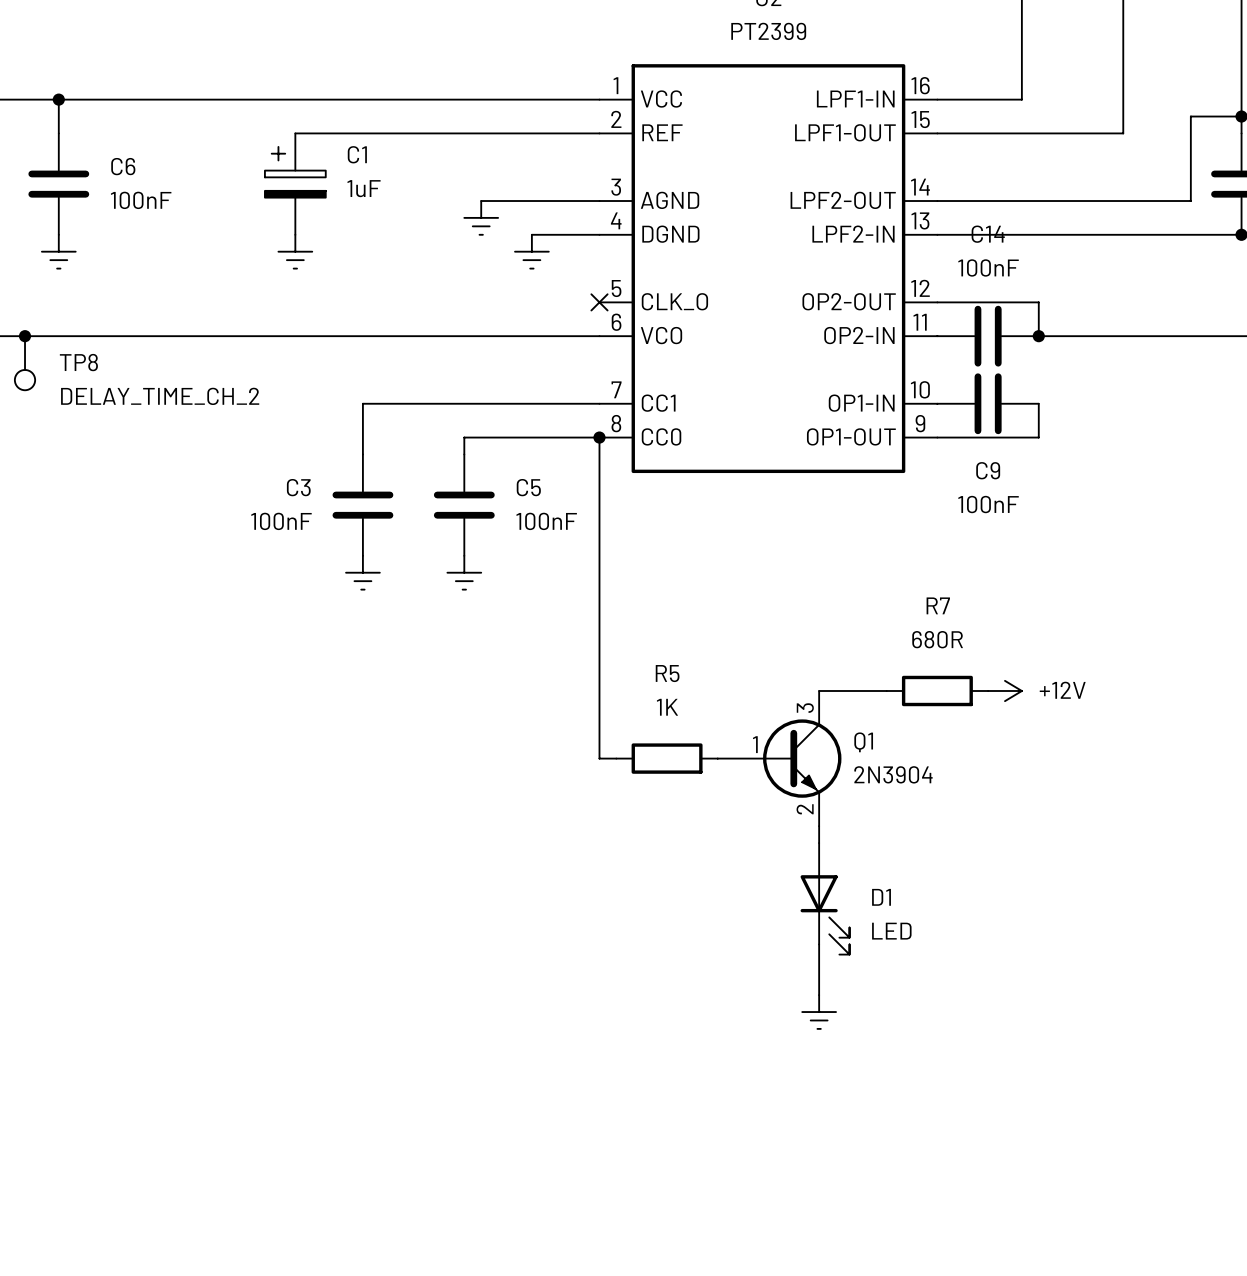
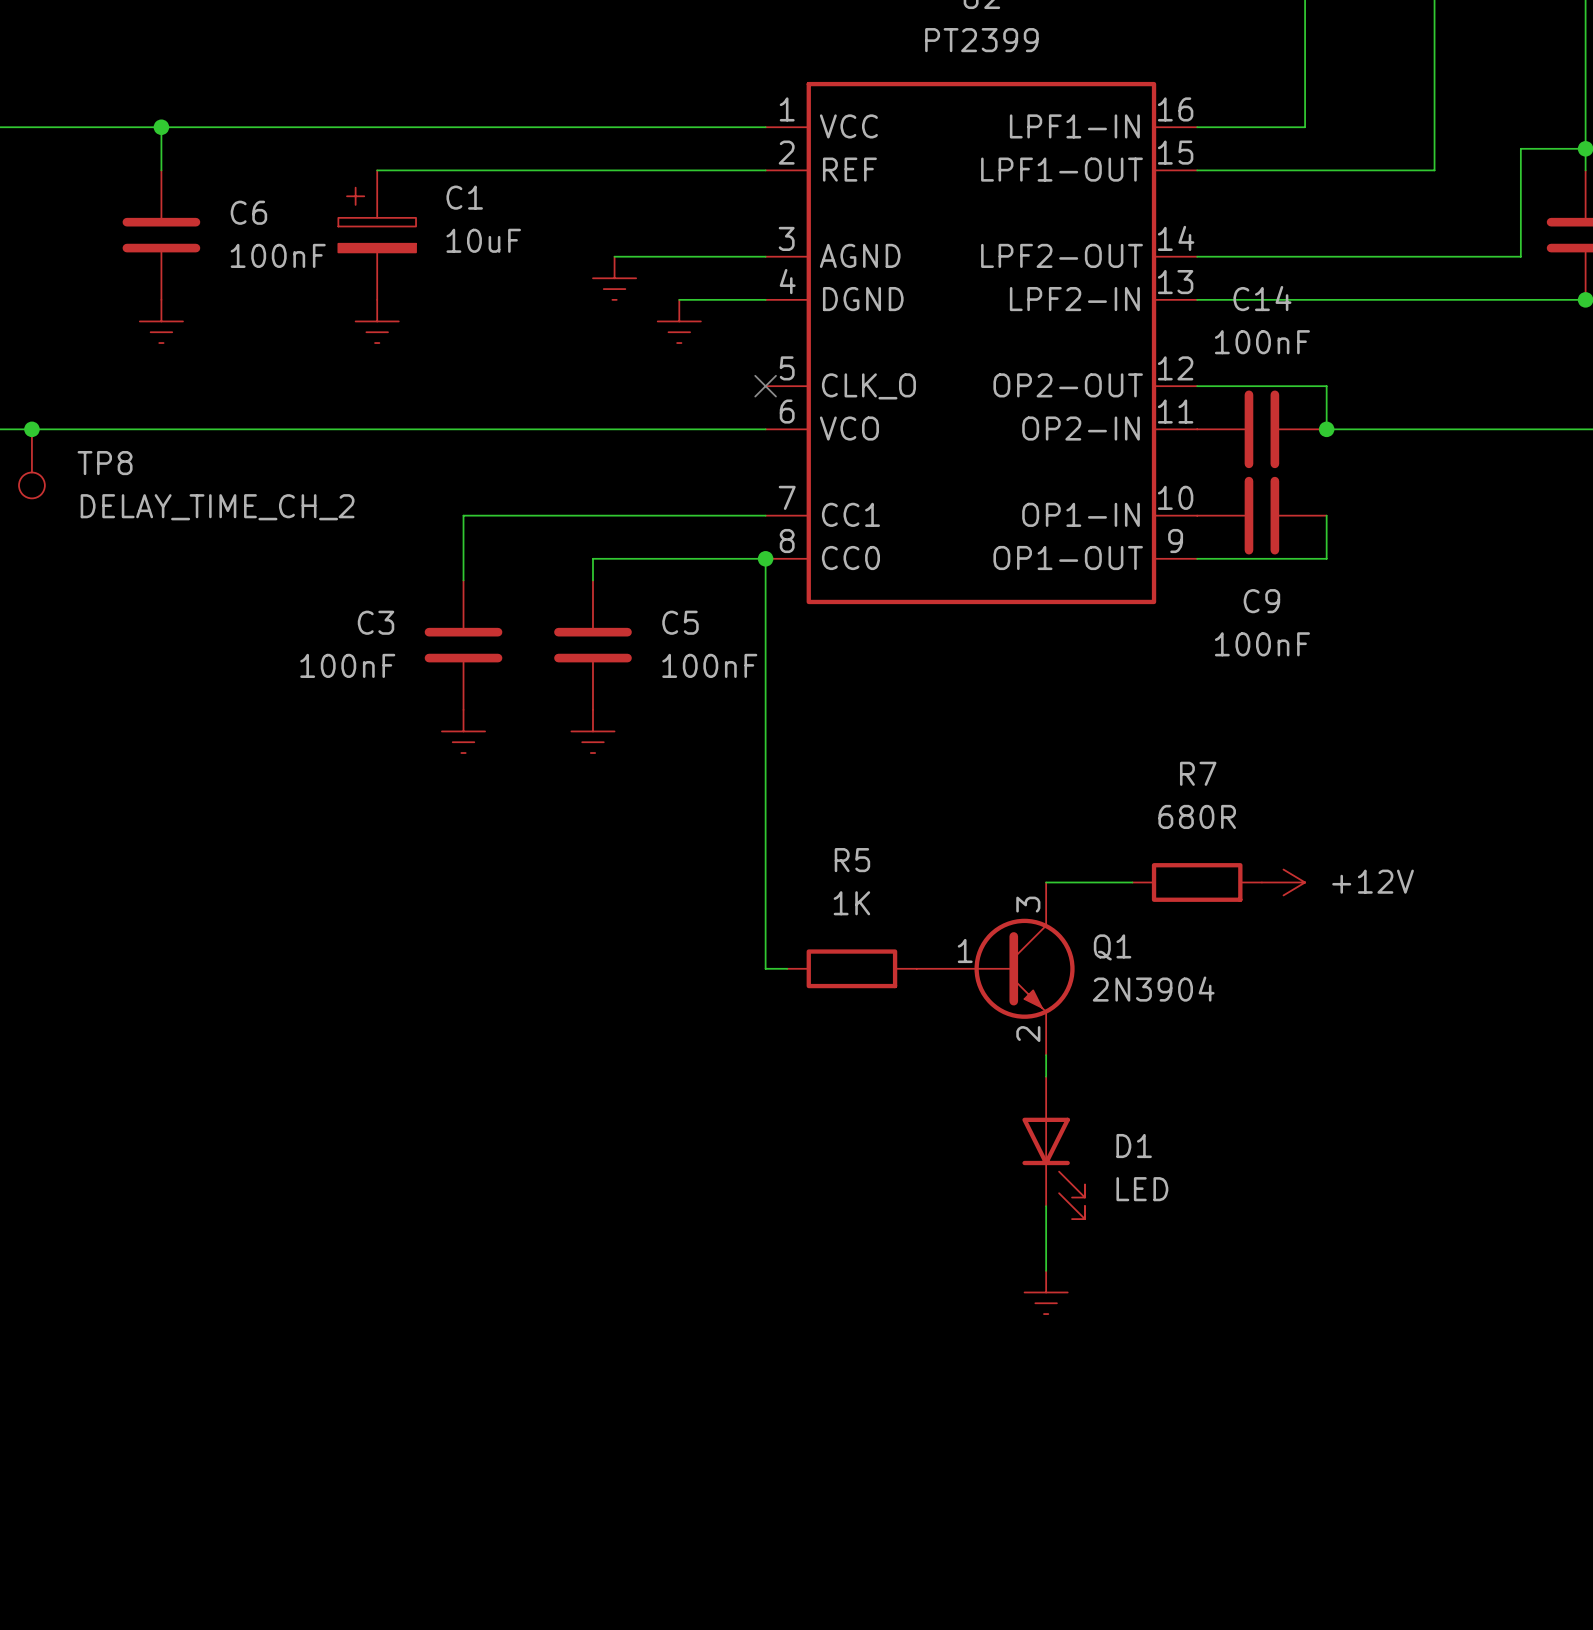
wire: (58, 99) (58, 133) -> (161, 127) (161, 170)
junction position: (58, 99) -> (161, 127)
C6 position: (58, 184) -> (161, 235)
C1 value: 1uF (364, 188) -> 10uF (483, 240)
power symbol position: (58, 251) -> (161, 321)

